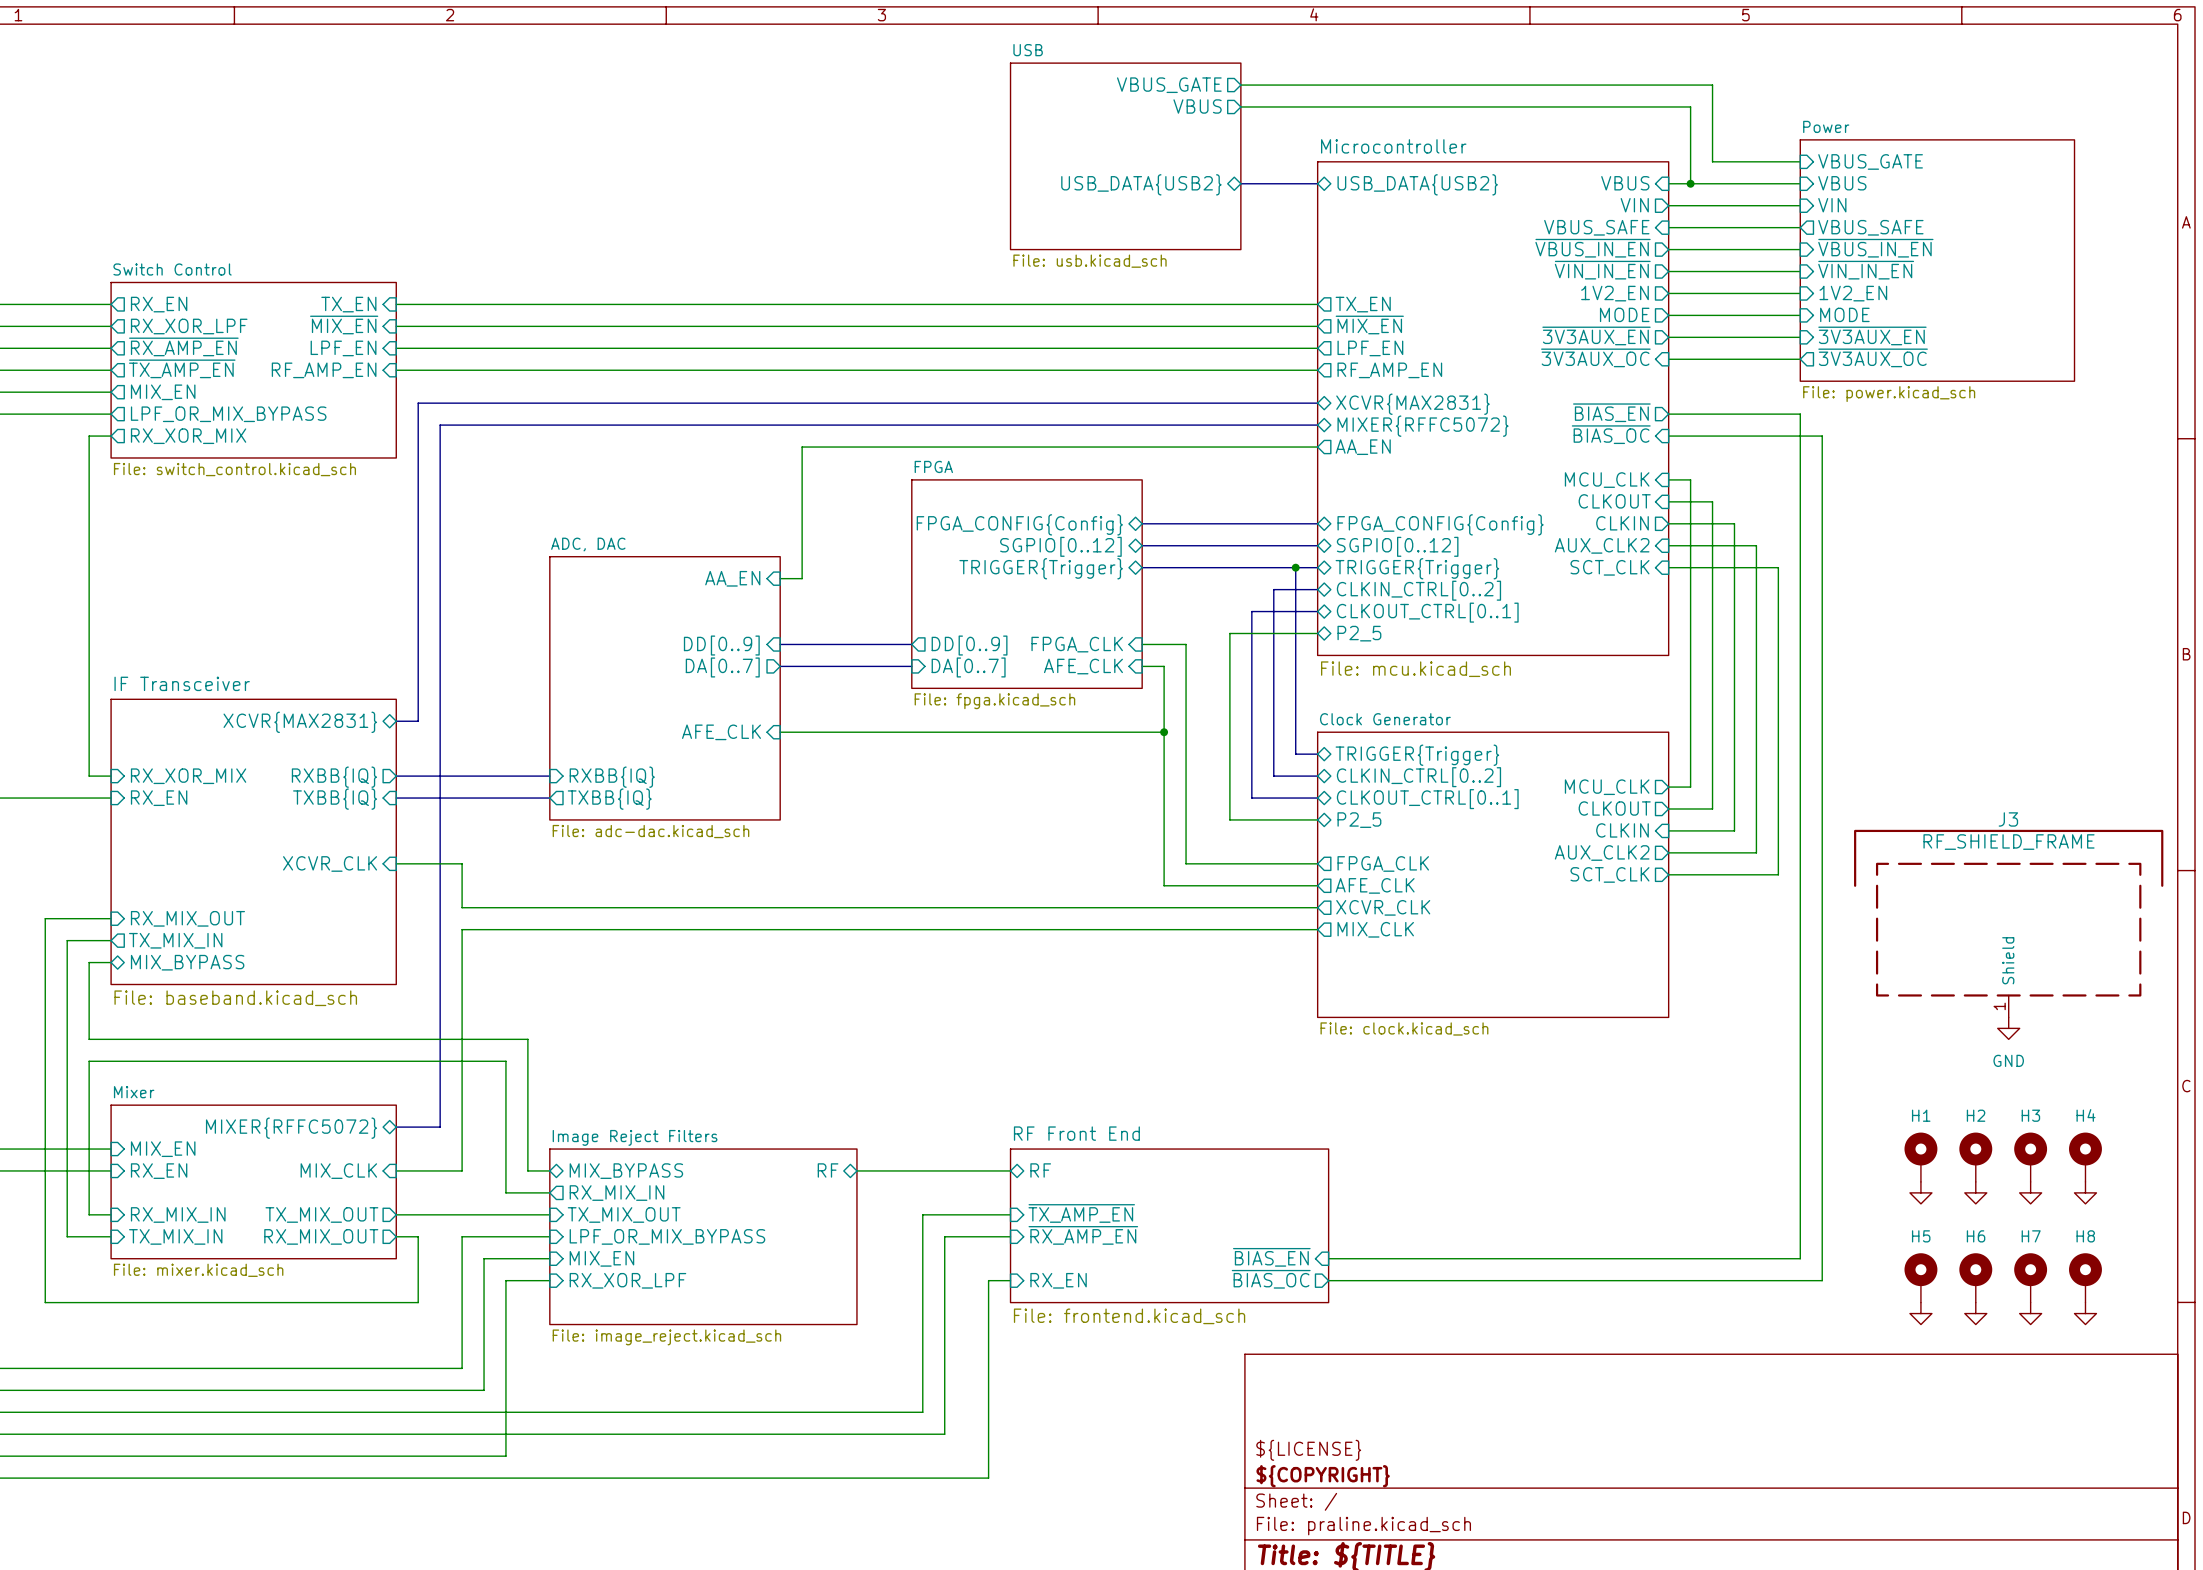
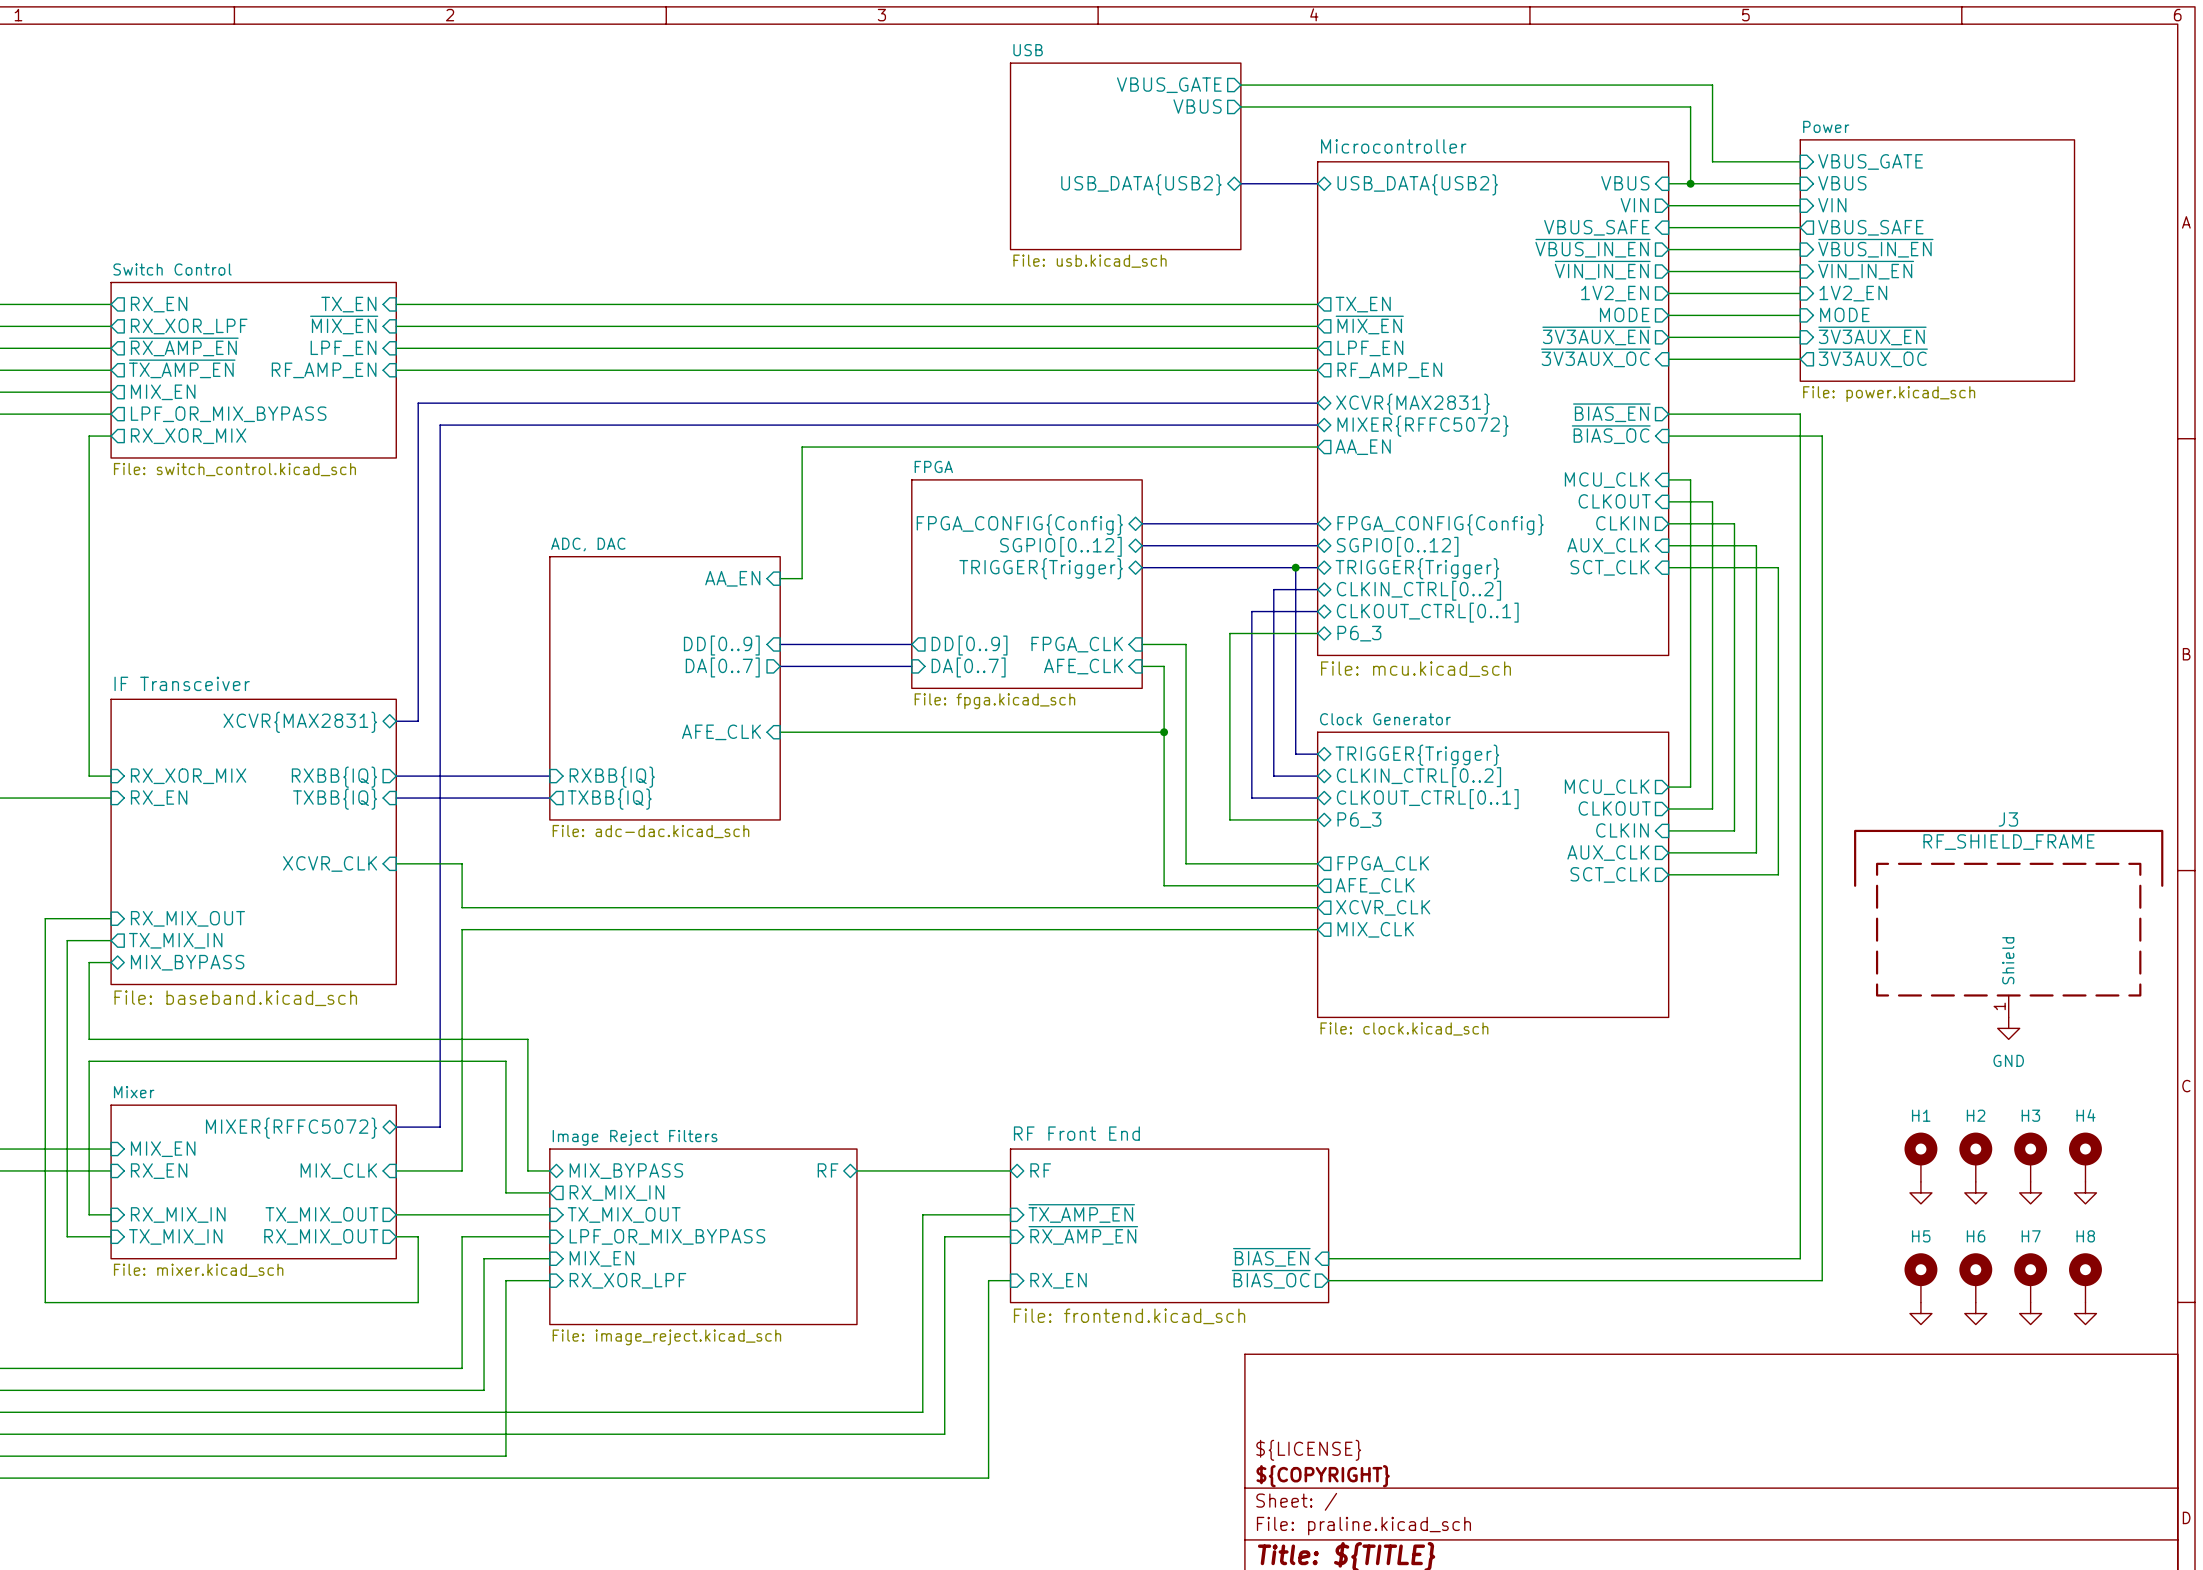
sheet pin: AUX_CLK2 (1602, 545) -> AUX_CLK (1608, 545)
sheet pin: P2_5 (1359, 633) -> P6_3 (1359, 633)
sheet pin: P2_5 (1359, 820) -> P6_3 (1359, 820)
sheet pin: AUX_CLK2 (1602, 853) -> AUX_CLK (1608, 853)

